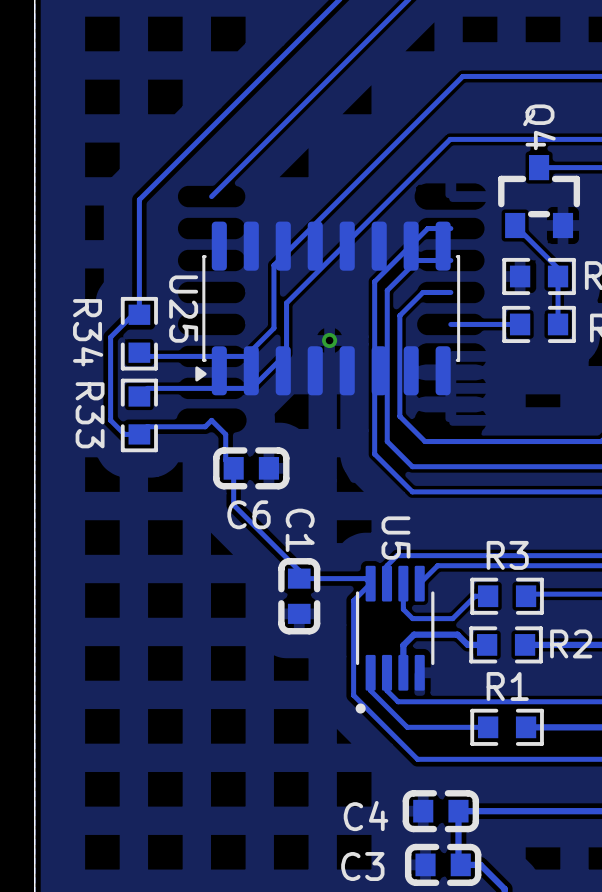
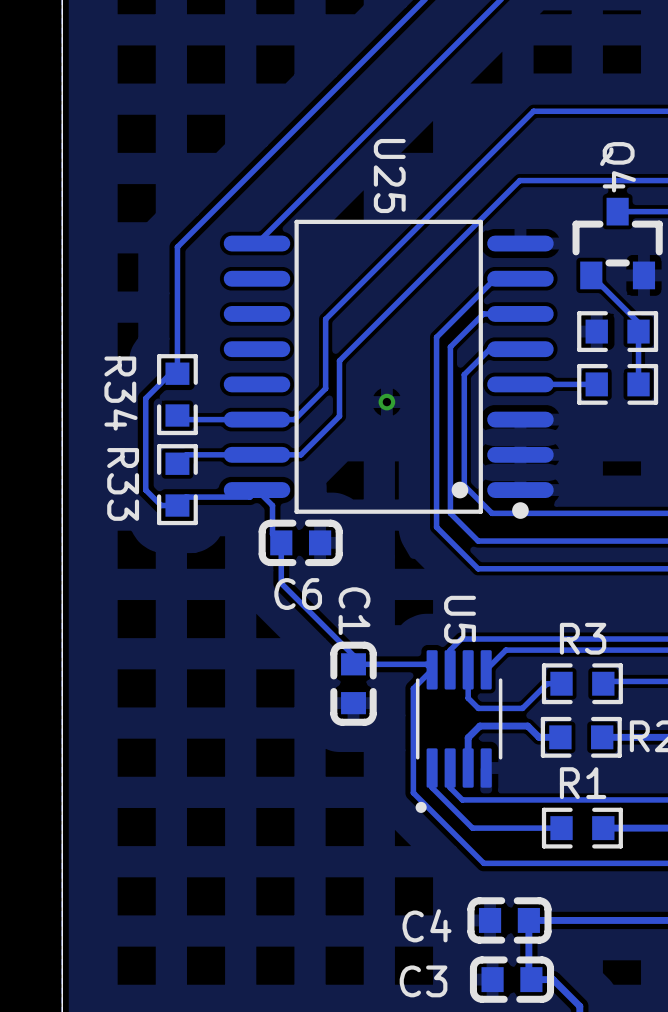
U25 footprint: [195, 221, 461, 396] -> [223, 219, 554, 519]
U25 name position: U25 (183, 309) -> U25 (389, 176)

